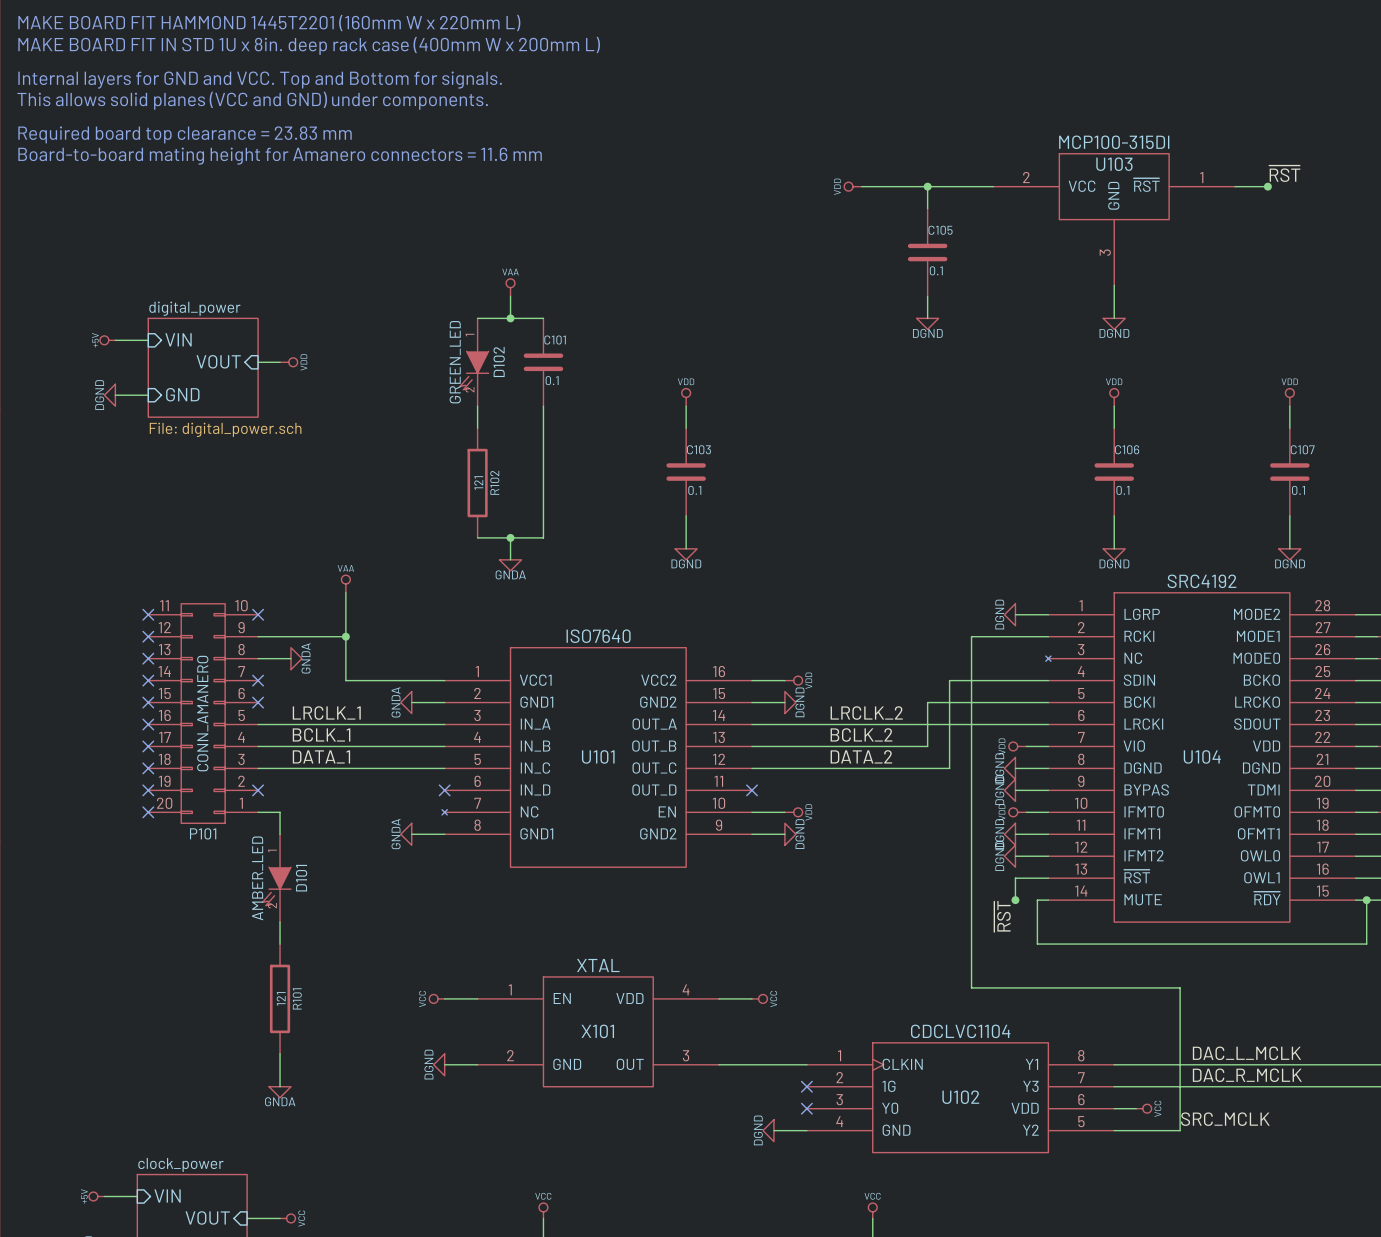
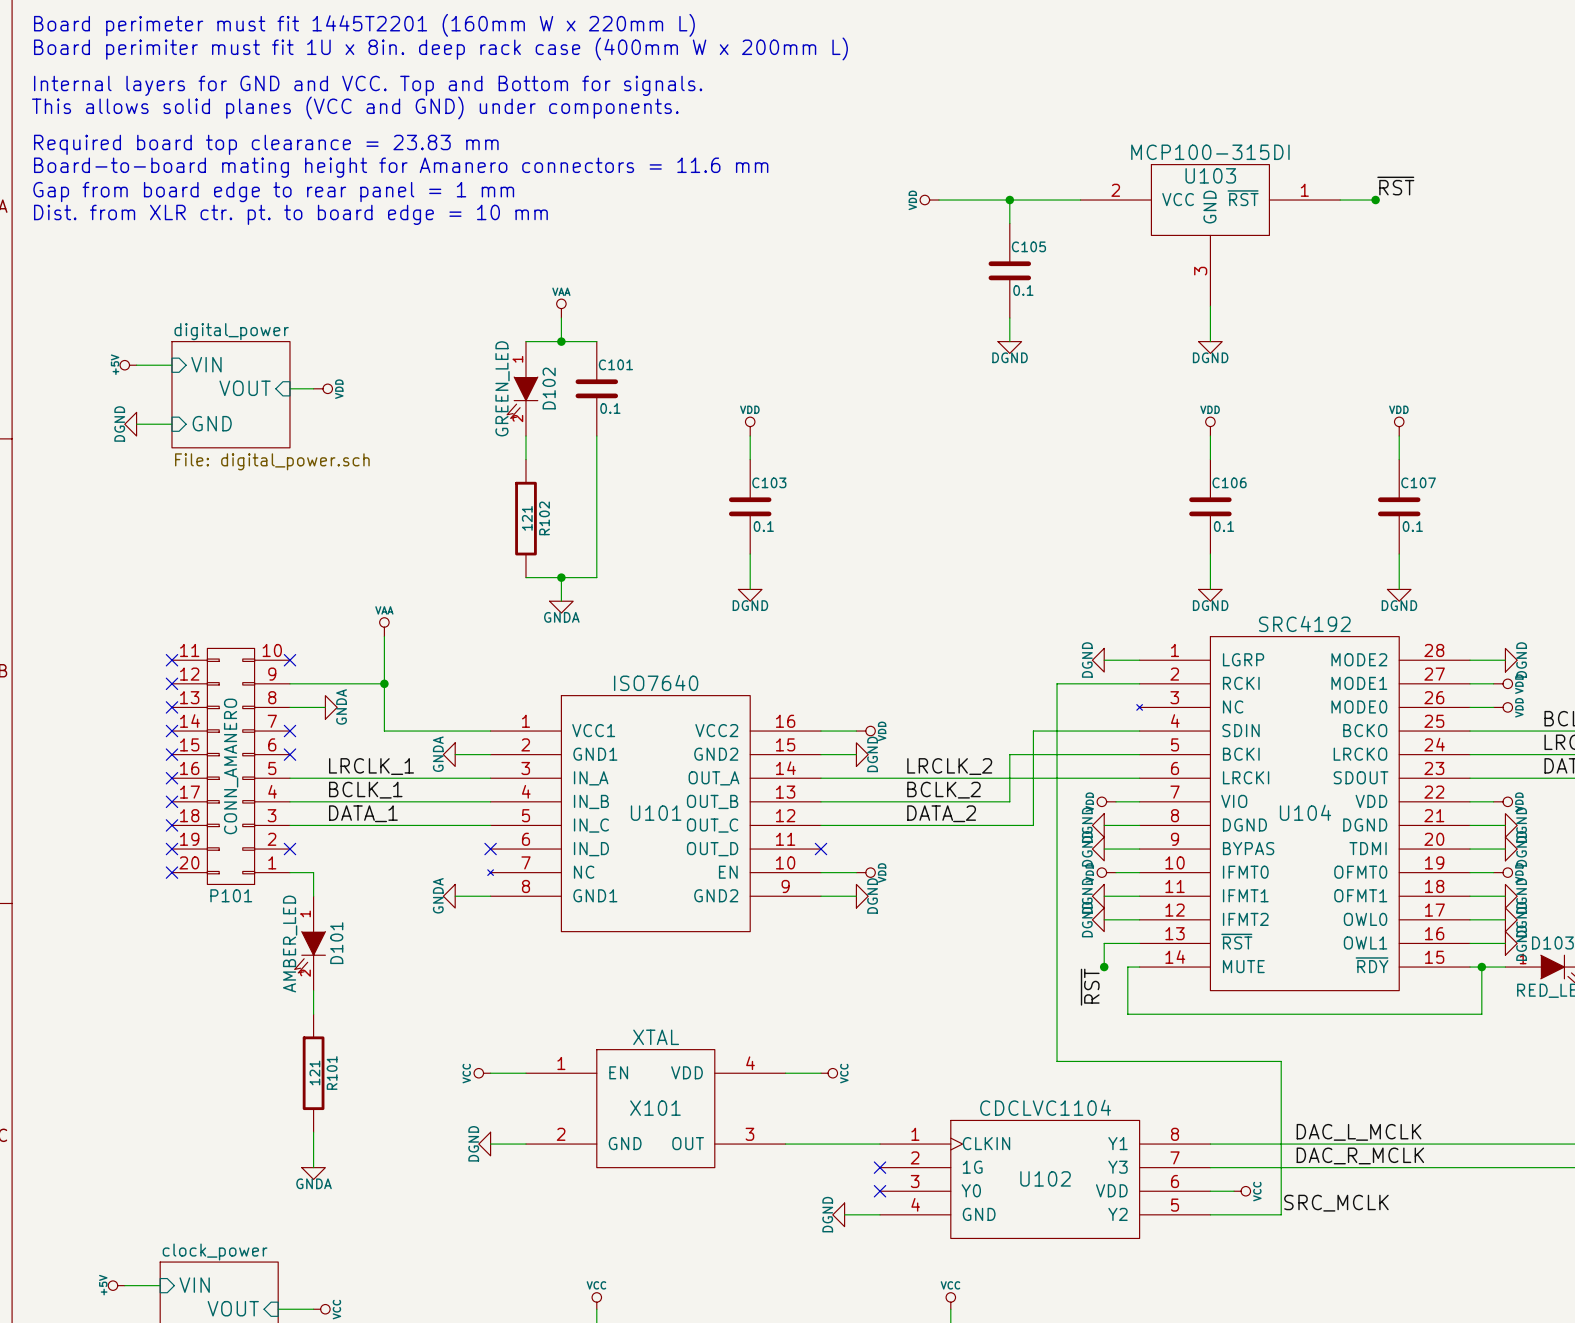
text: MAKE BOARD FIT HAMMOND 1445T2201 (160mm W x 220mm L) (269, 23) -> Board perimeter must fit 1445T2201 (160mm W x 220mm L) (364, 25)
text: MAKE BOARD FIT IN STD 1U x 8in. deep rack case (400mm W x 200mm L) (309, 45) -> Board perimiter must fit 1U x 8in. deep rack case (400mm W x 200mm L) (440, 48)
text: none -> Gap from board edge to rear panel = 1 mm (273, 192)
text: none -> Dist. from XLR ctr. pt. to board edge = 10 mm (290, 214)

